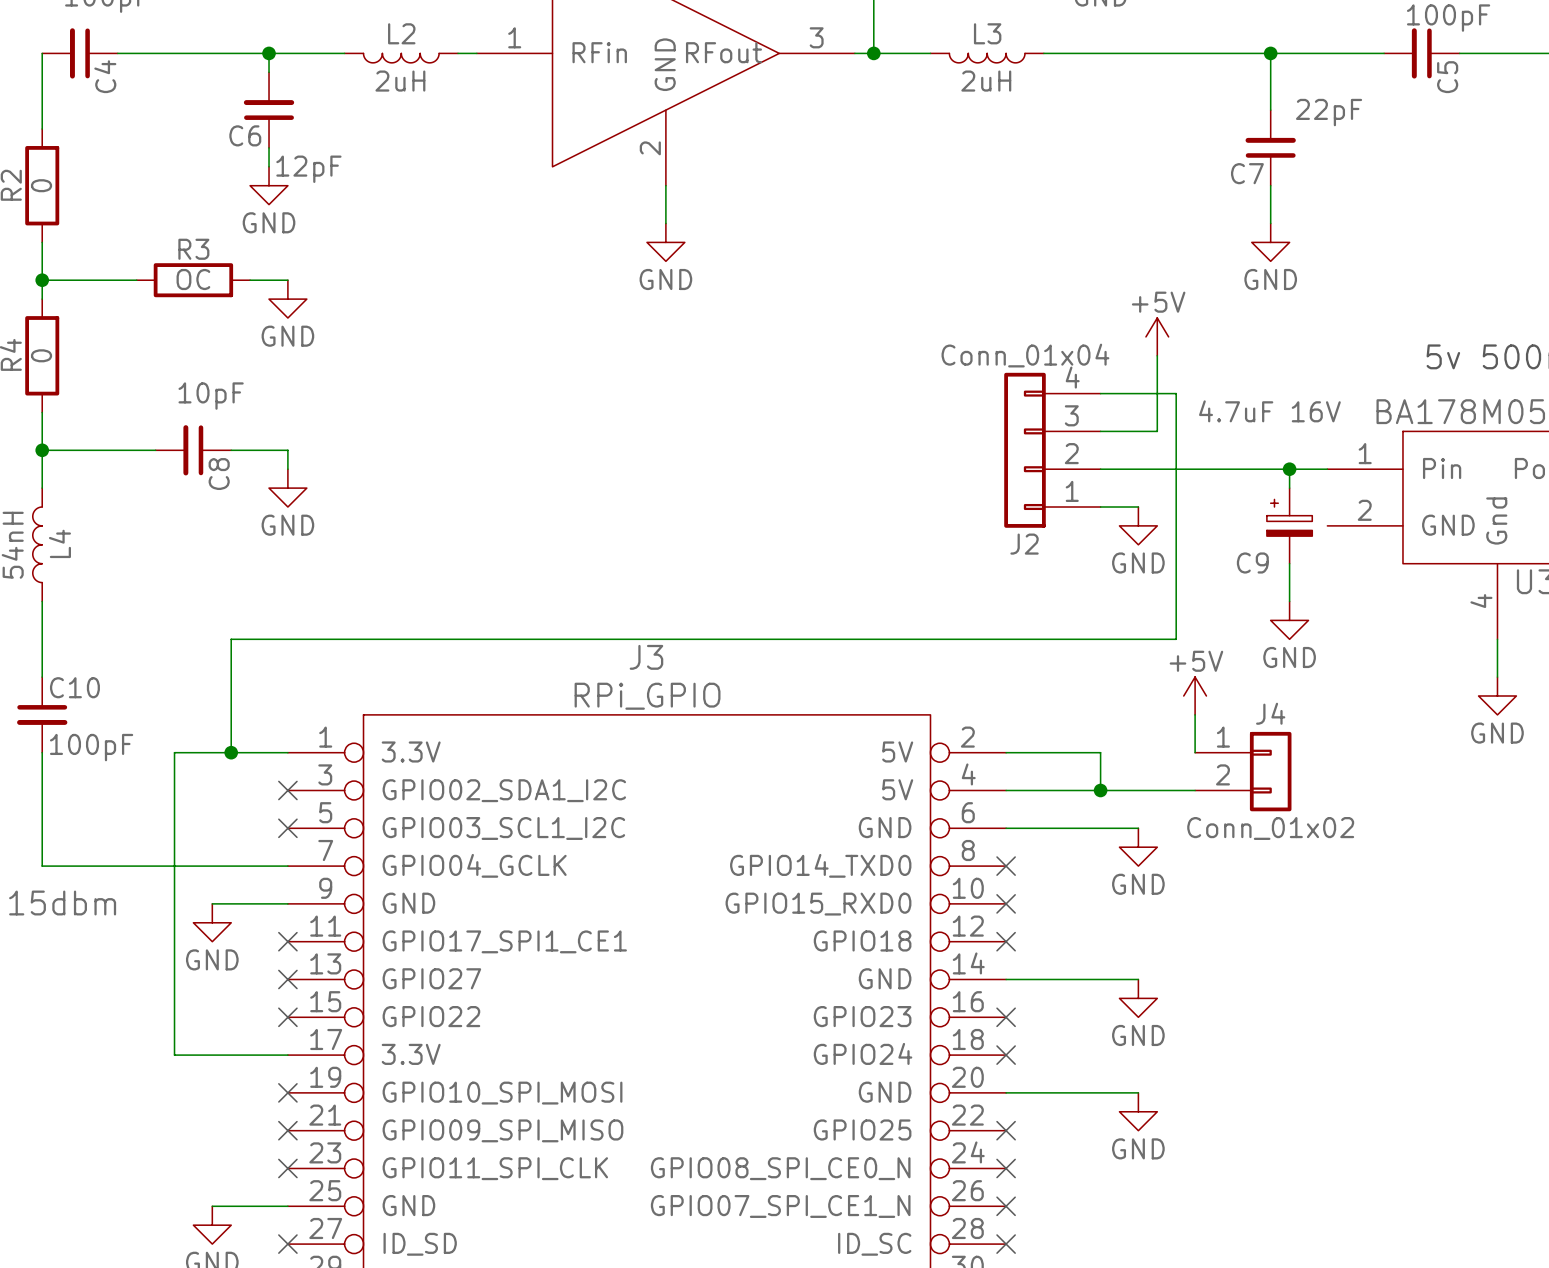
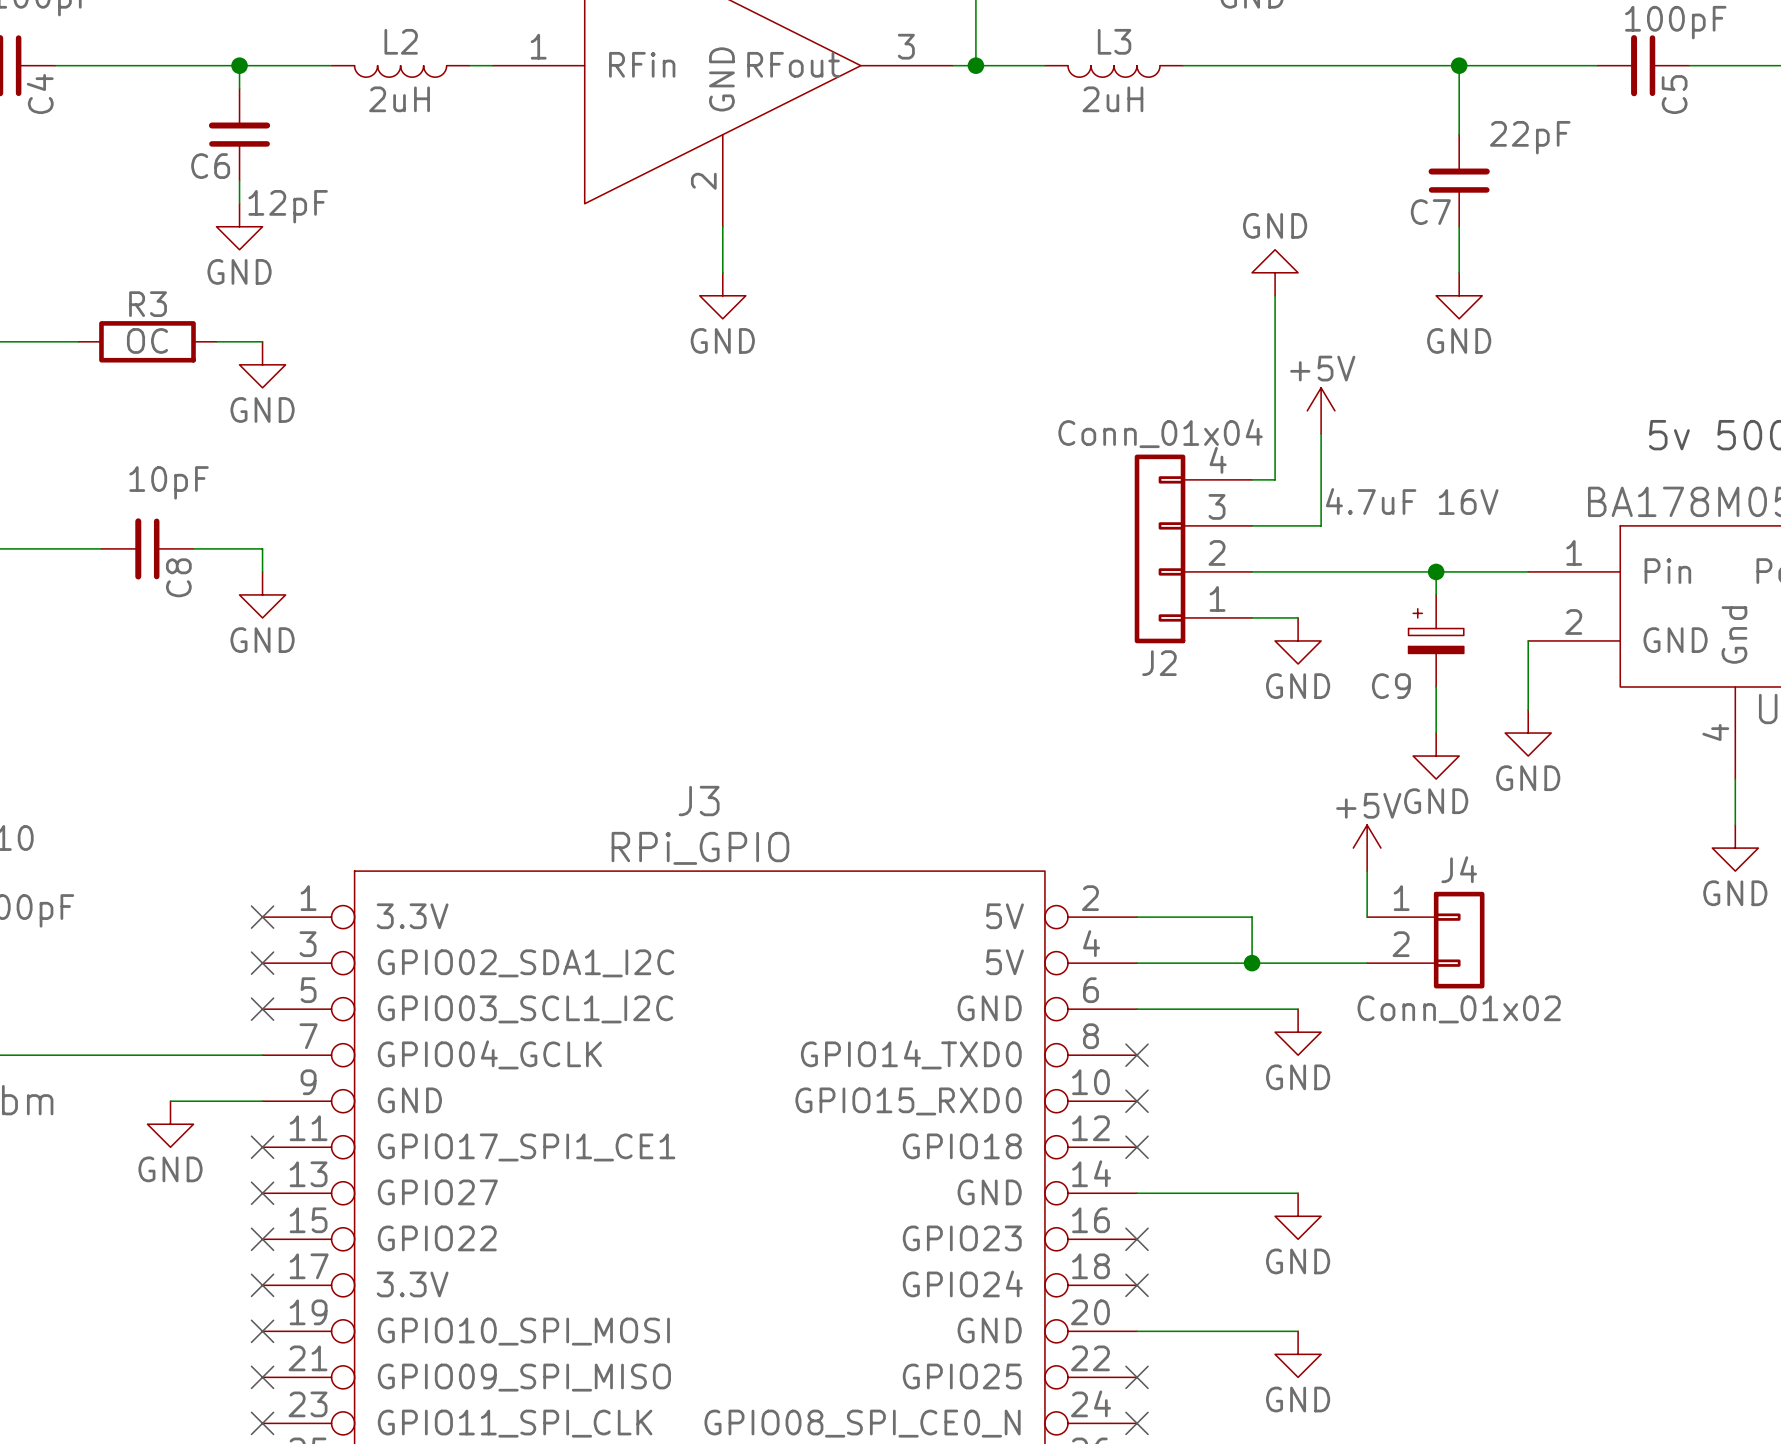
power symbol: none -> GND (1275, 272)
wire: (1119, 393) (1176, 393) (1176, 639) (231, 639) (231, 752) -> (1275, 479) (1275, 295)
wire: (1289, 469) (1289, 488) -> (1436, 571) (1436, 594)
junction position: (1289, 469) -> (1436, 571)
C9 position: (1289, 525) -> (1436, 640)
wire: none -> (1528, 640) (1528, 710)
wire: (1289, 563) (1289, 601) -> (1436, 687) (1436, 733)
power symbol: none -> GND (1528, 733)
power symbol: none -> GND (1436, 756)
power symbol: GND (1289, 620) -> none
junction: (231, 752) -> none
wire: (287, 752) (174, 752) (174, 1055) (287, 1055) -> none
no-connect mark: none -> (262, 917)
no-connect mark: none -> (262, 1285)

